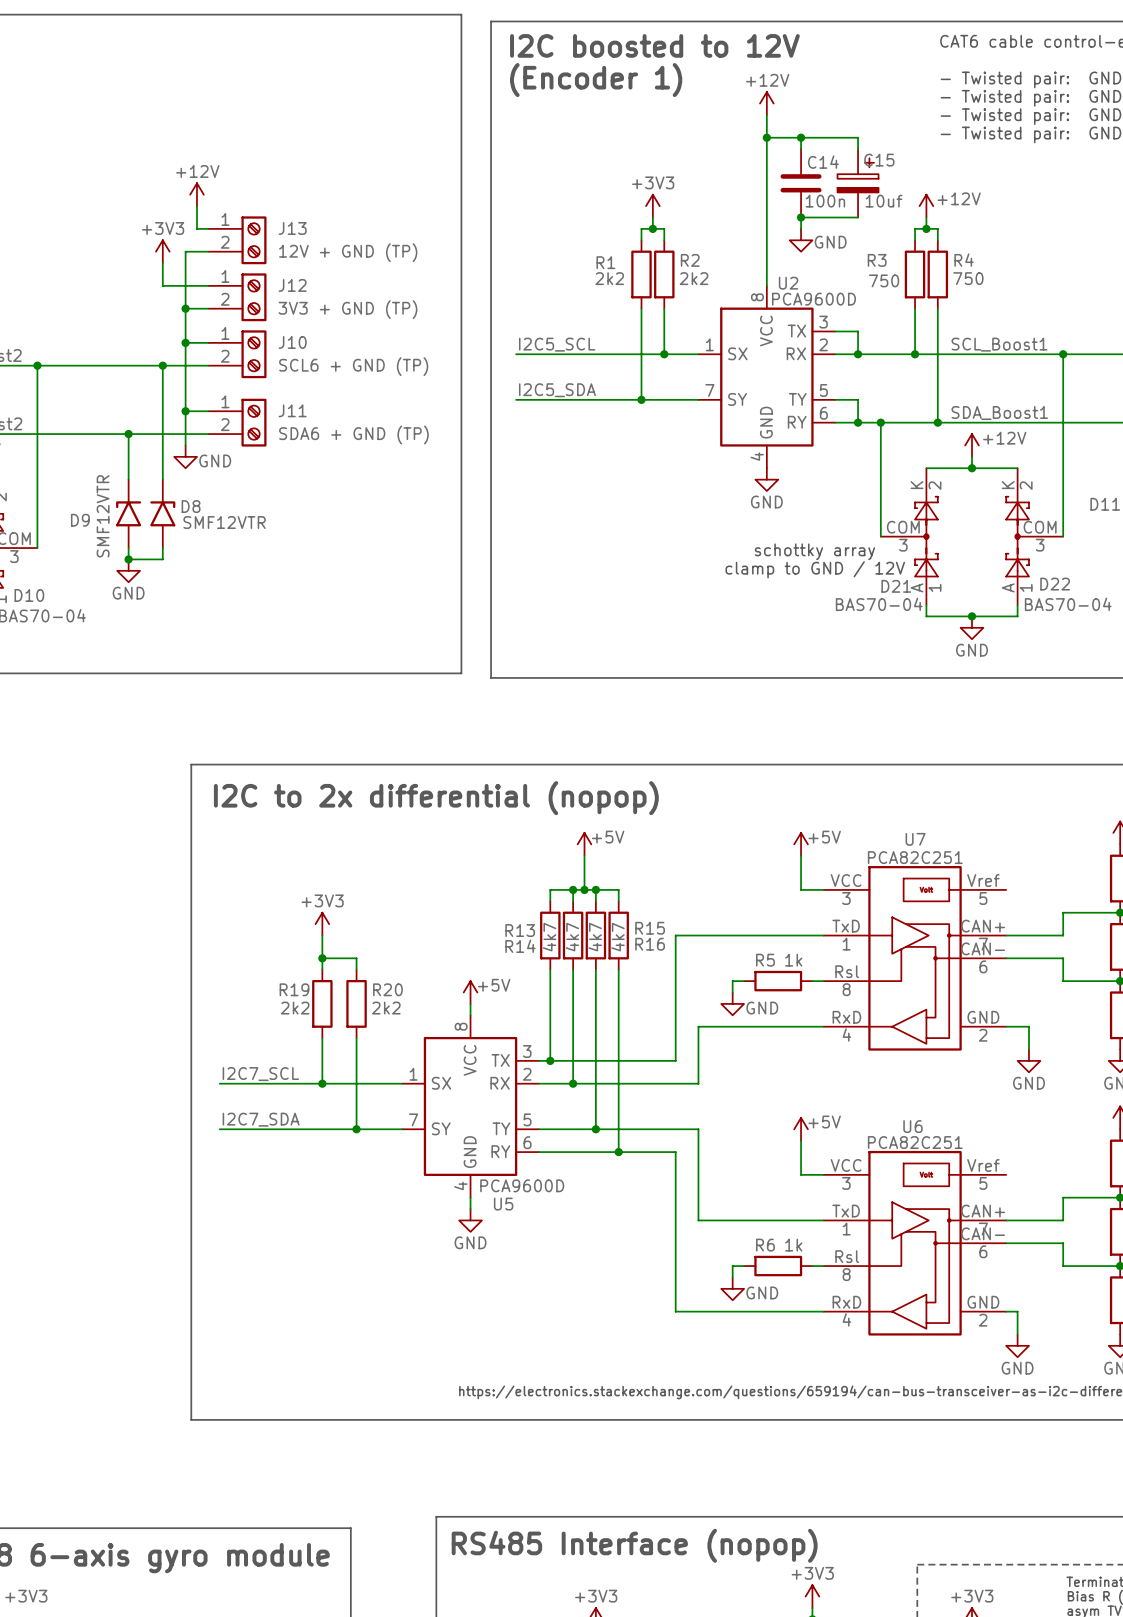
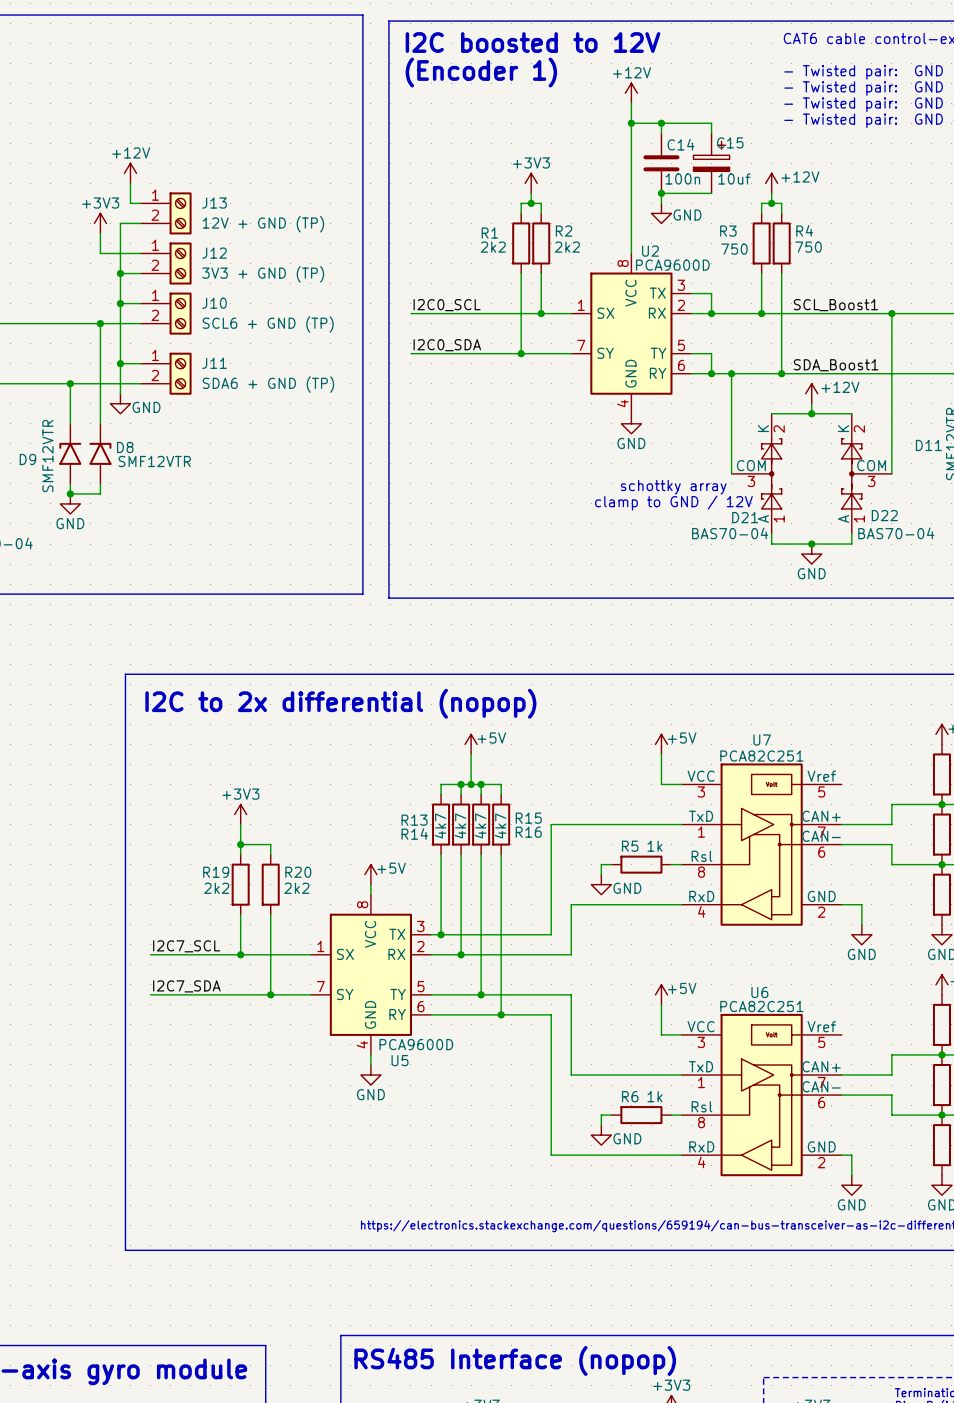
label: I2C5_SCL (557, 344) -> I2C0_SCL (447, 305)
label: I2C5_SDA (557, 390) -> I2C0_SDA (447, 345)

